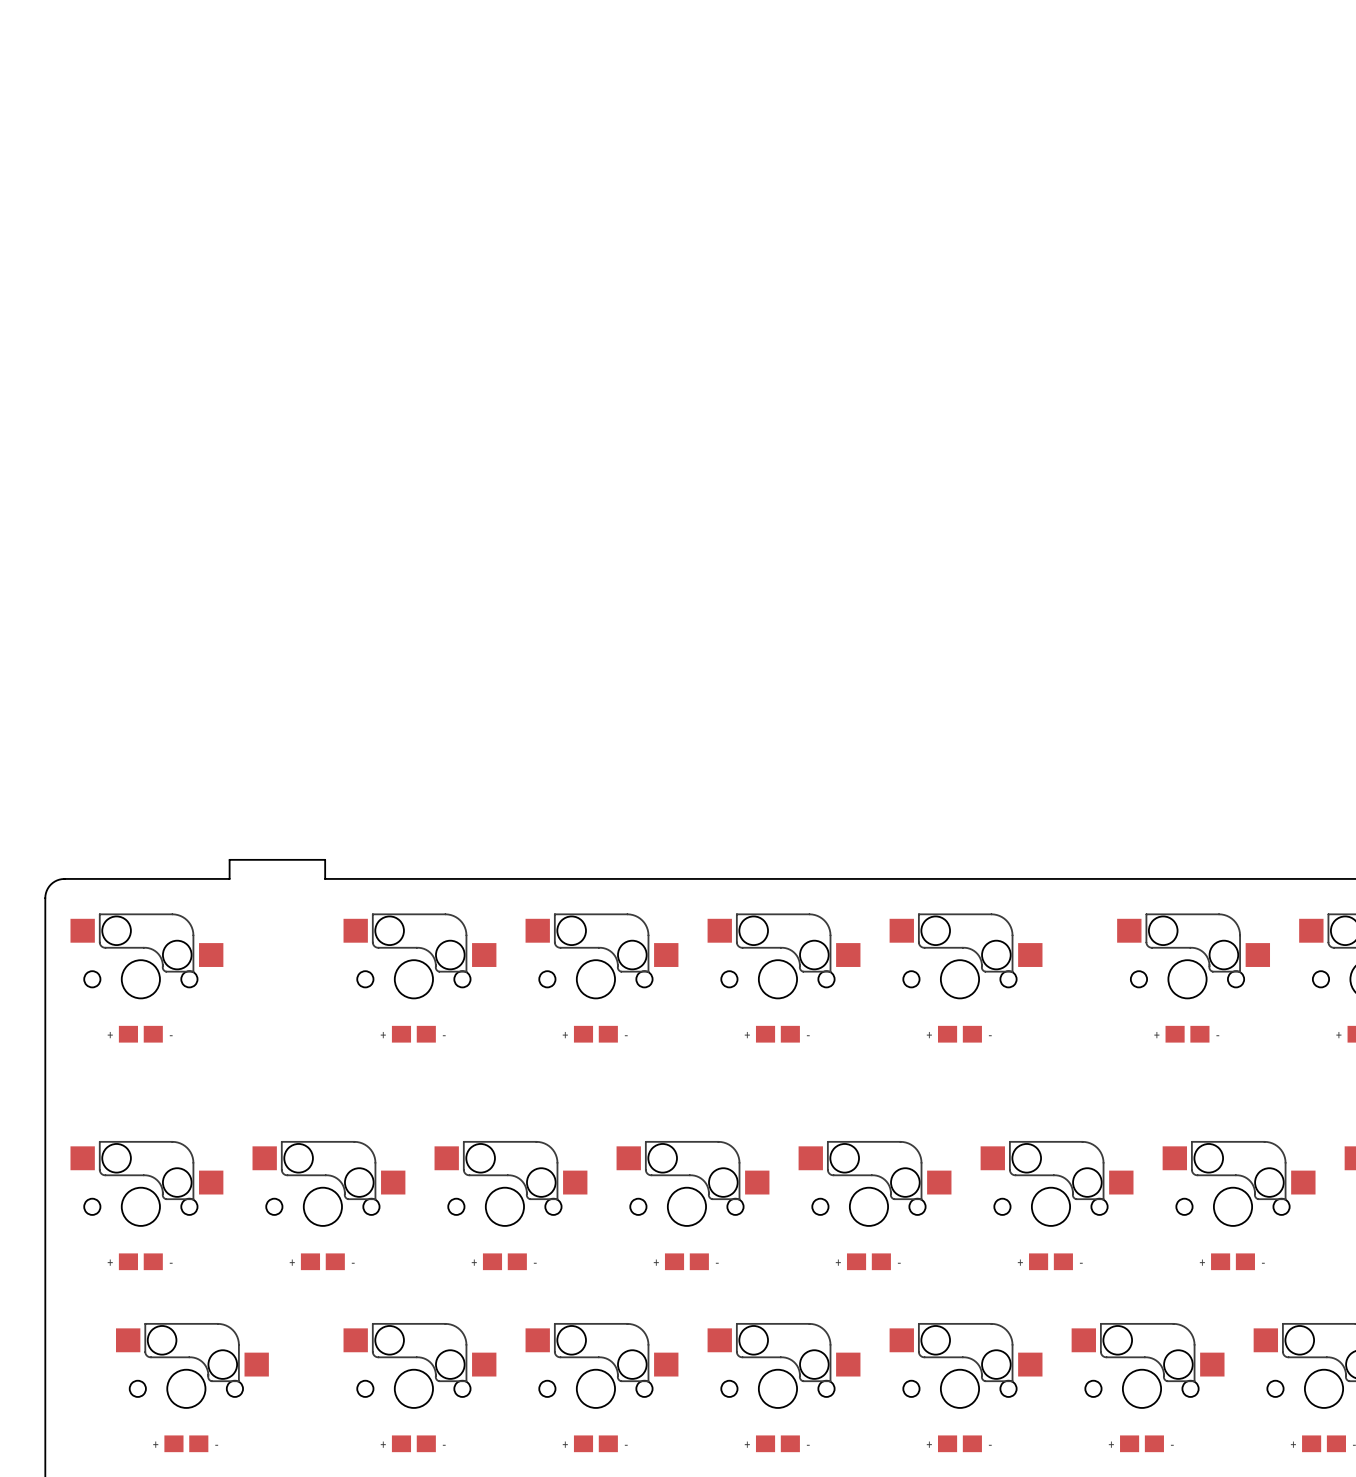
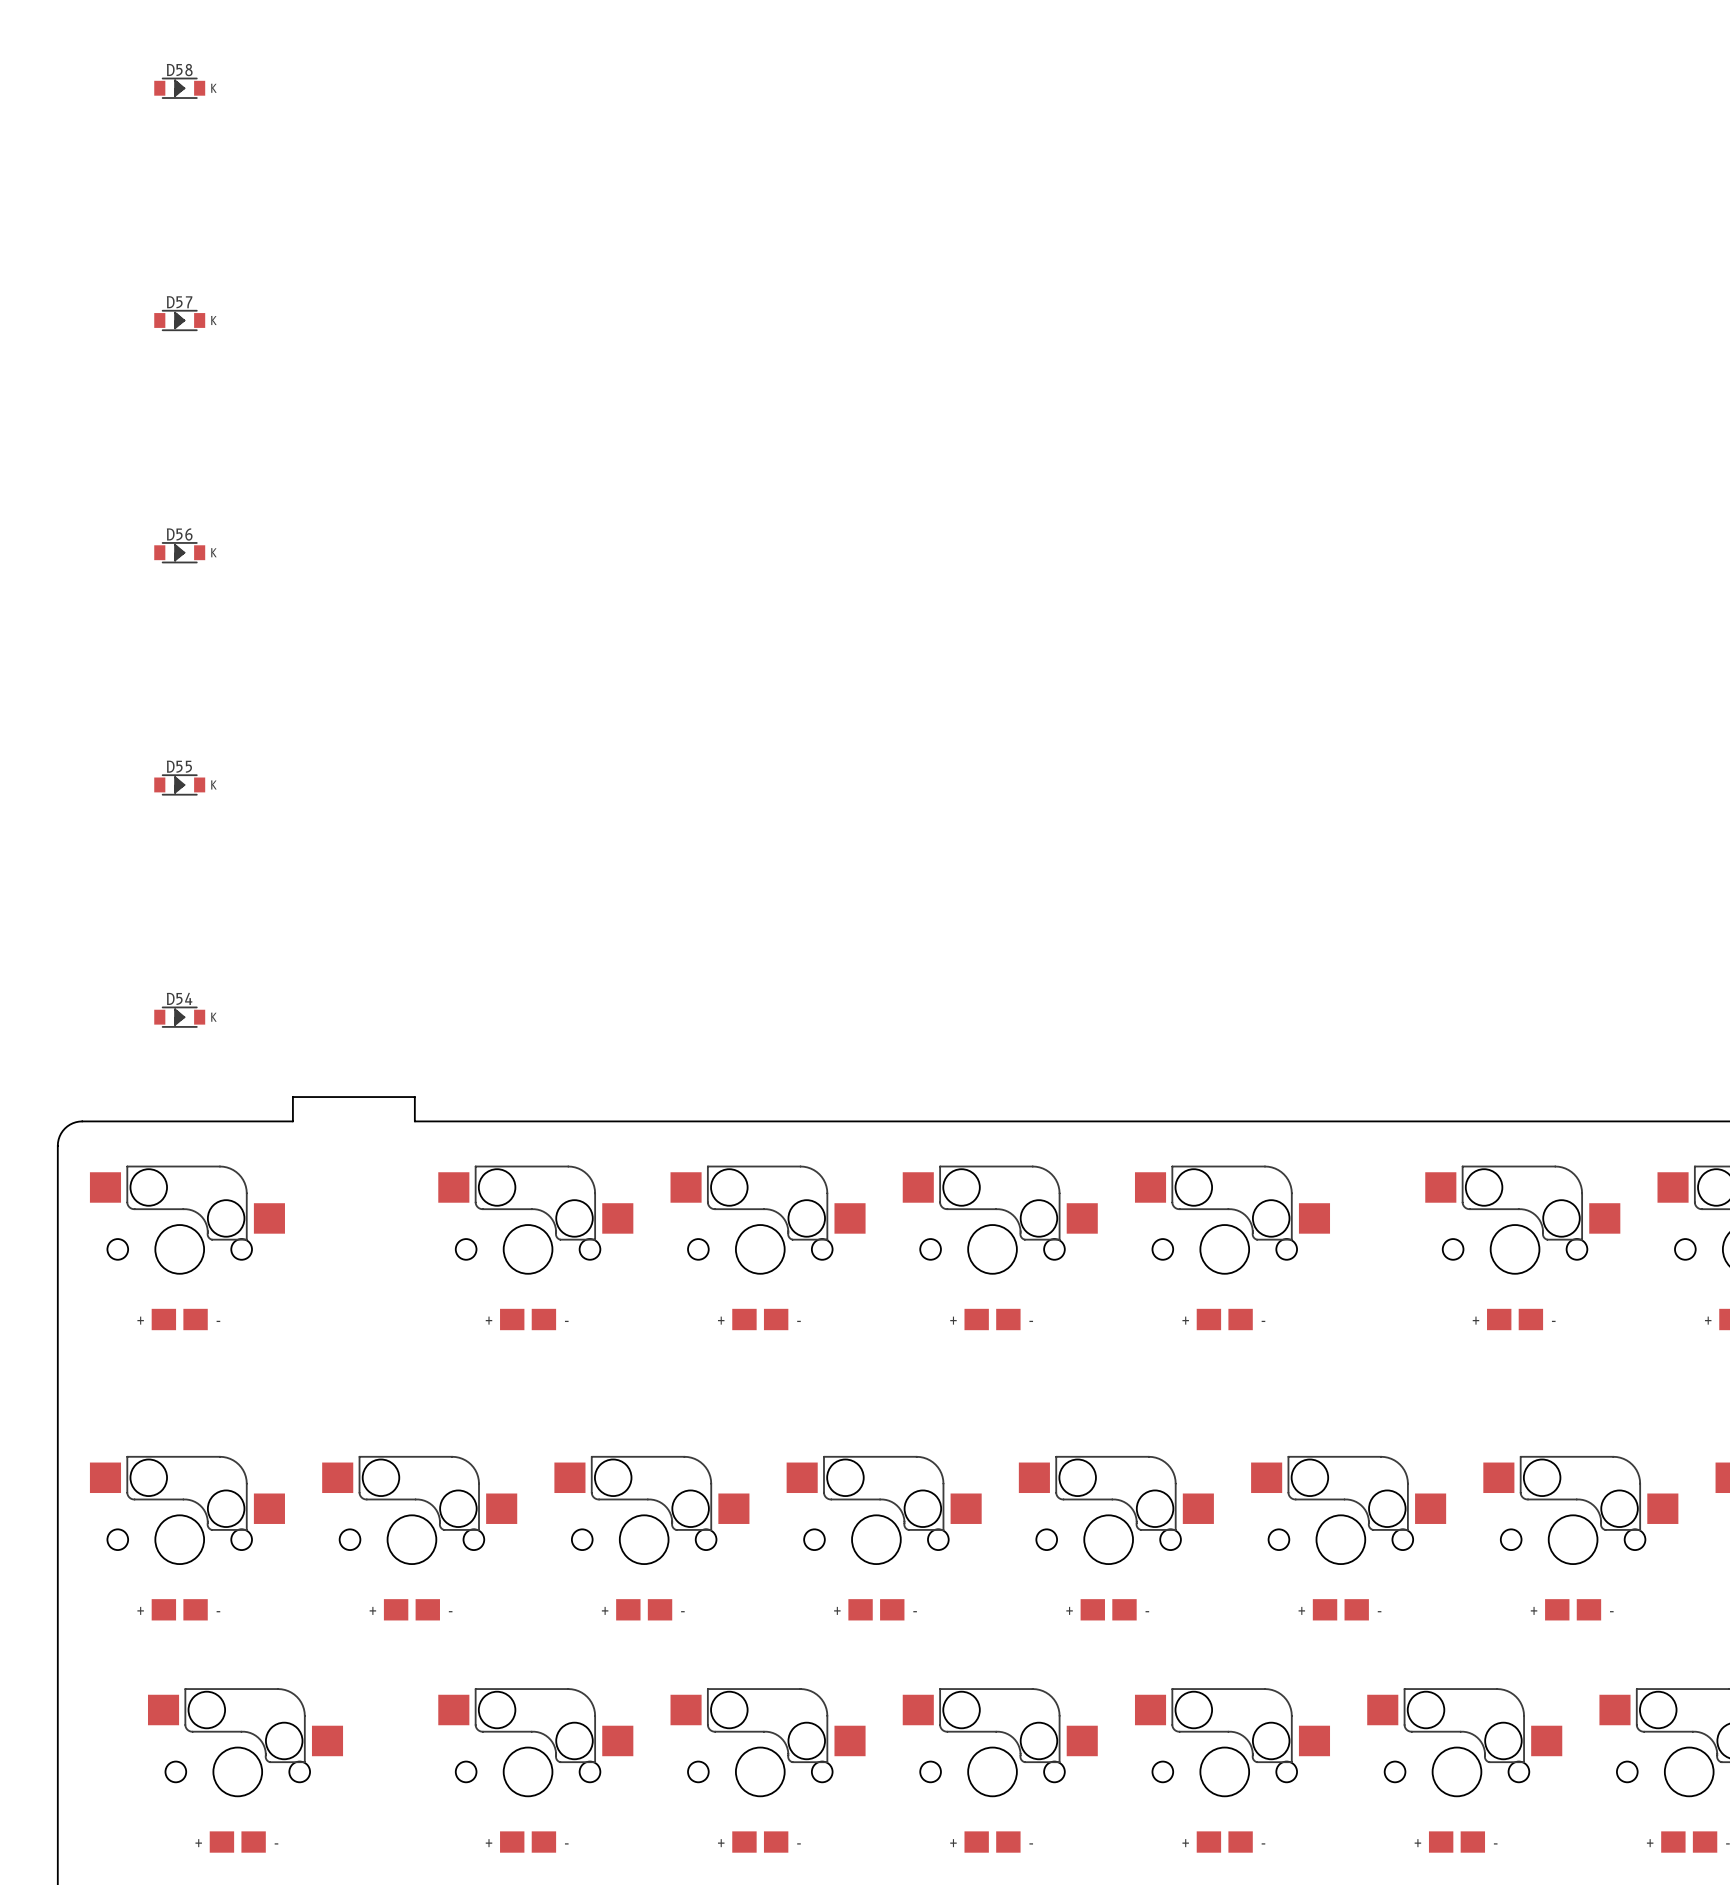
D58: none -> (179, 88)
D57: none -> (179, 320)
D56: none -> (179, 552)
D55: none -> (179, 784)
D54: none -> (179, 1017)

